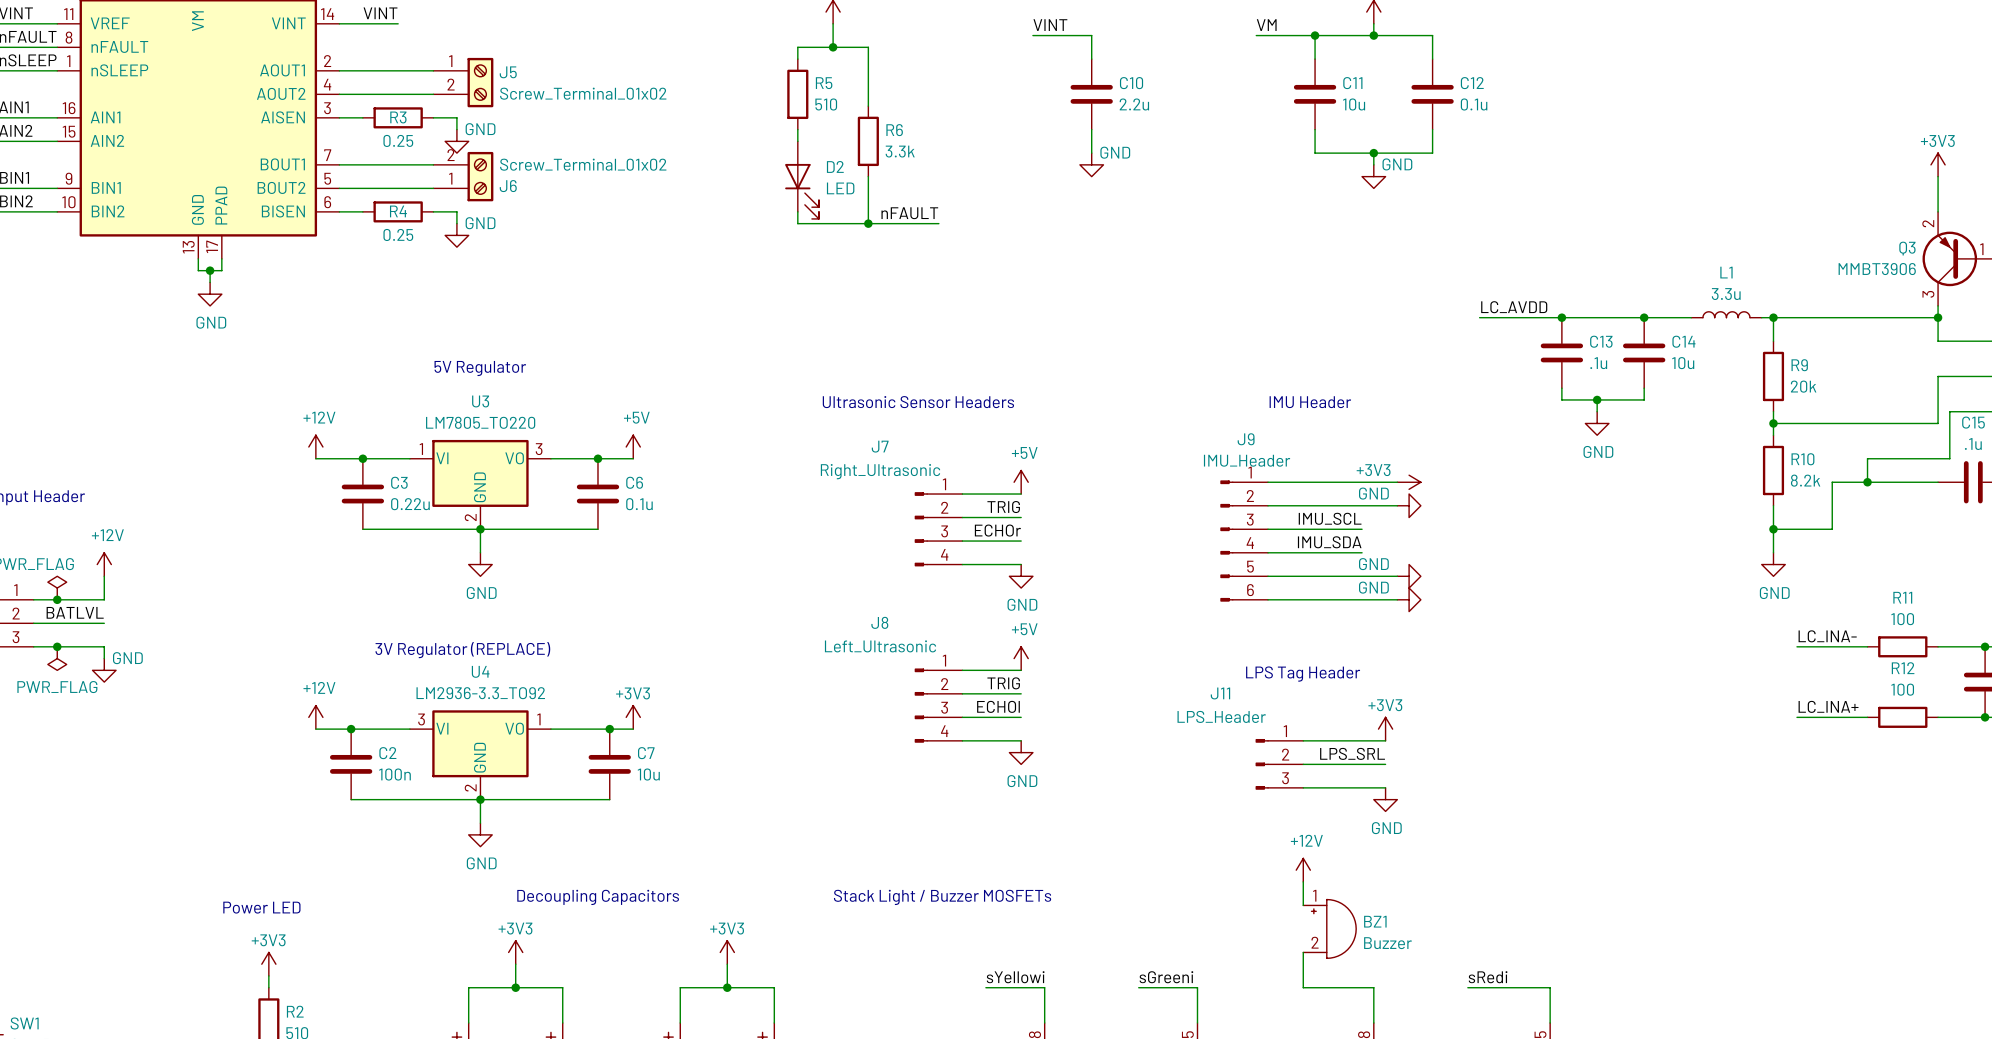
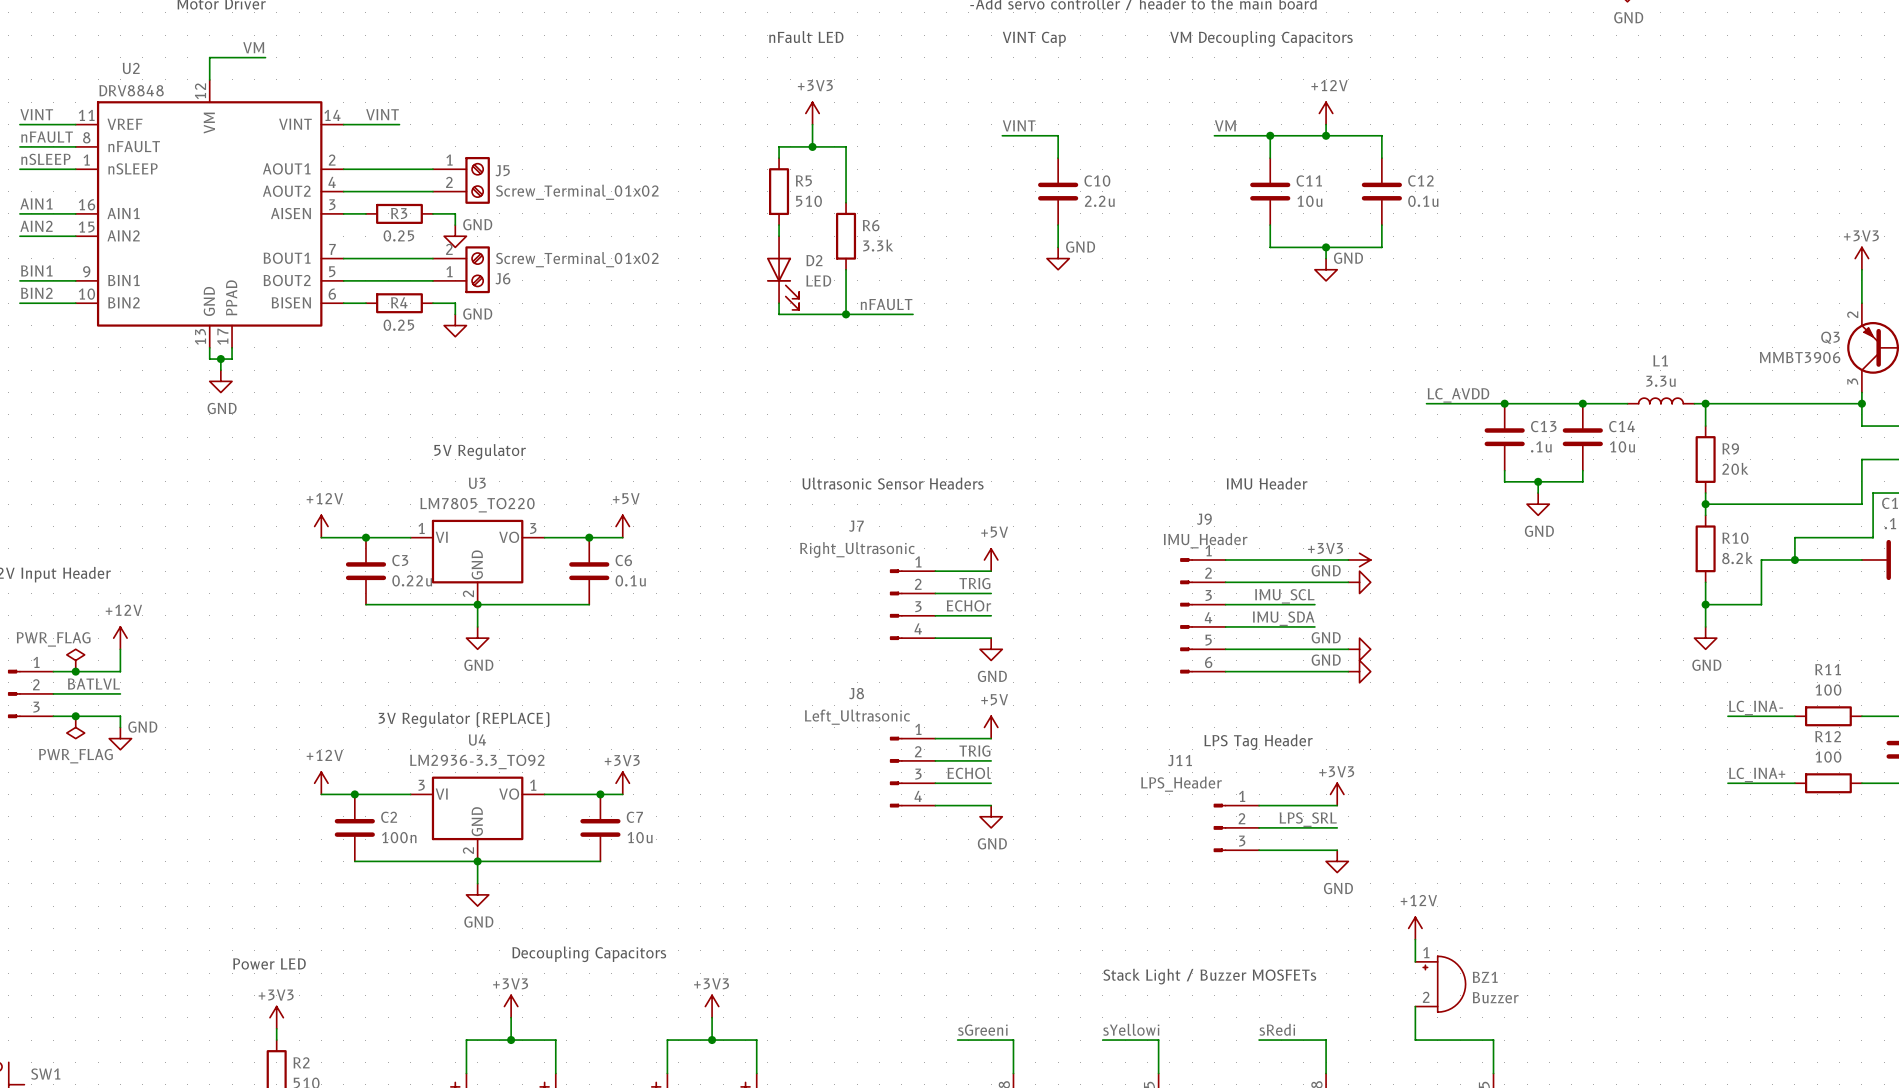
power symbol position: +12V (1303, 870) -> +12V (1415, 928)
wire: (1303, 881) (1303, 905) -> (1415, 939) (1415, 961)
text: Stack Light / Buzzer MOSFETs (942, 897) -> none
text: none -> Stack Light / Buzzer MOSFETs (1209, 976)
BZ1 position: (1329, 928) -> (1440, 984)
wire: (1303, 952) (1303, 987) -> (1415, 1006) (1415, 1040)
label: sYellowi (1015, 977) -> sGreeni (982, 1030)
label: sGreeni (1166, 977) -> sYellowi (1131, 1029)
label position: sRedi (1488, 977) -> sRedi (1277, 1029)

